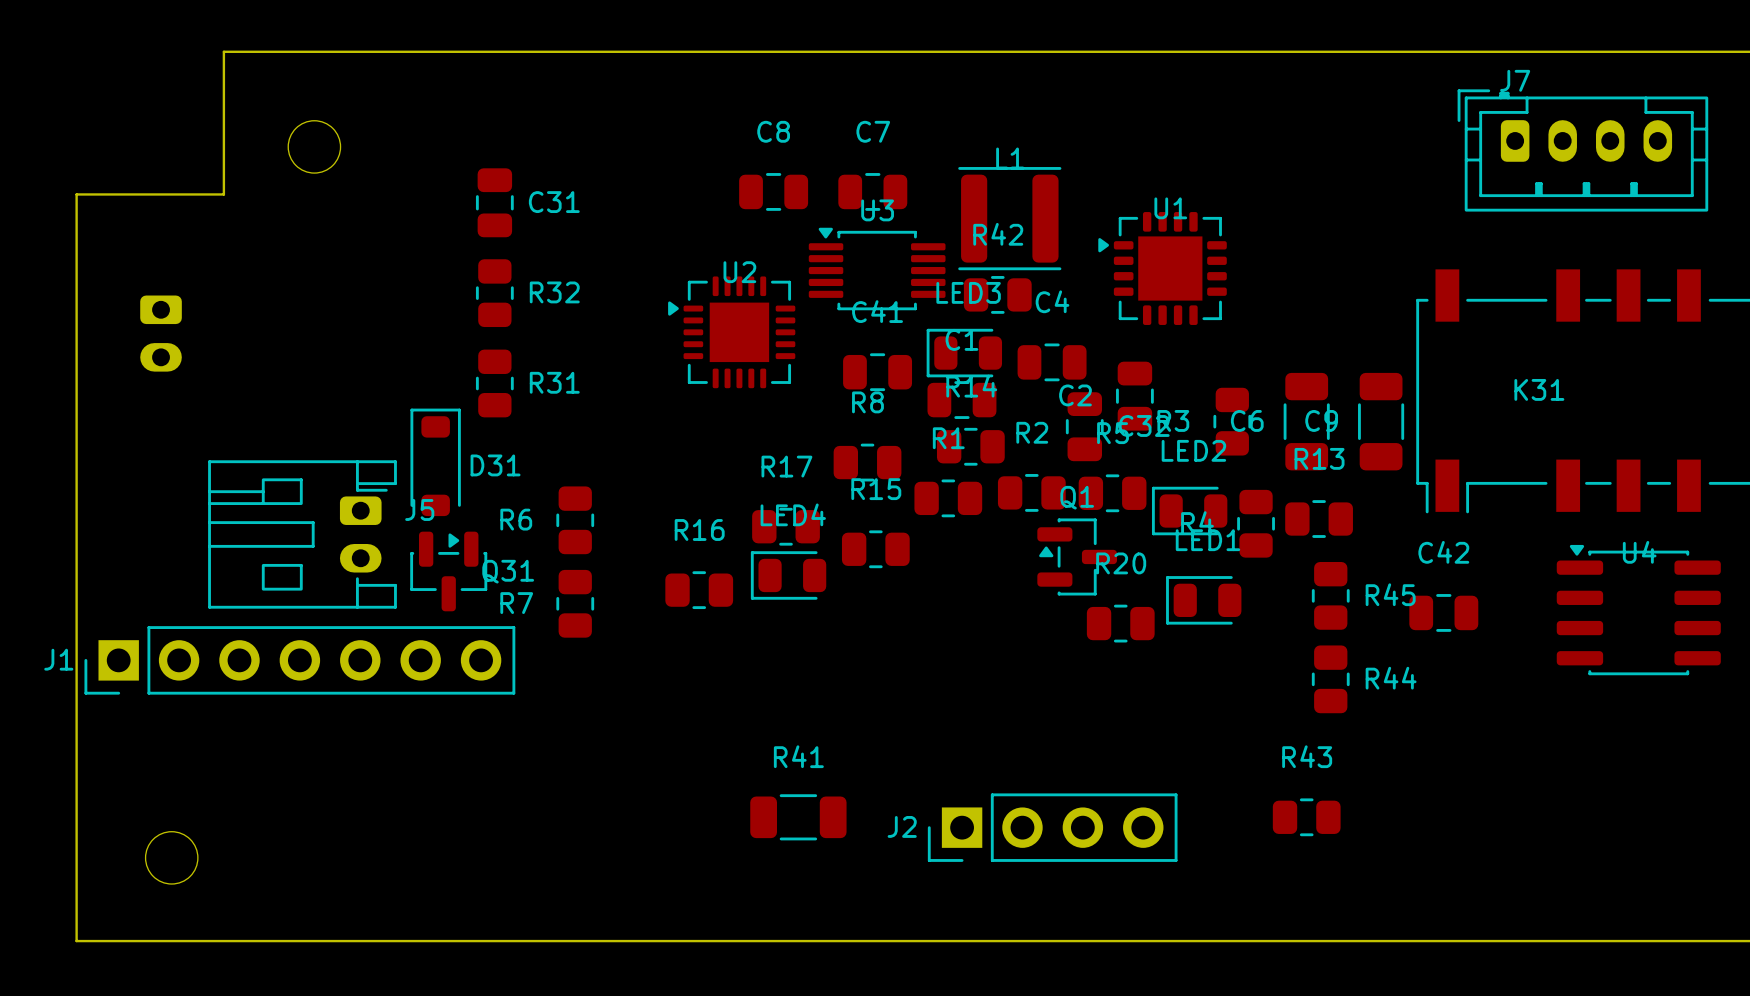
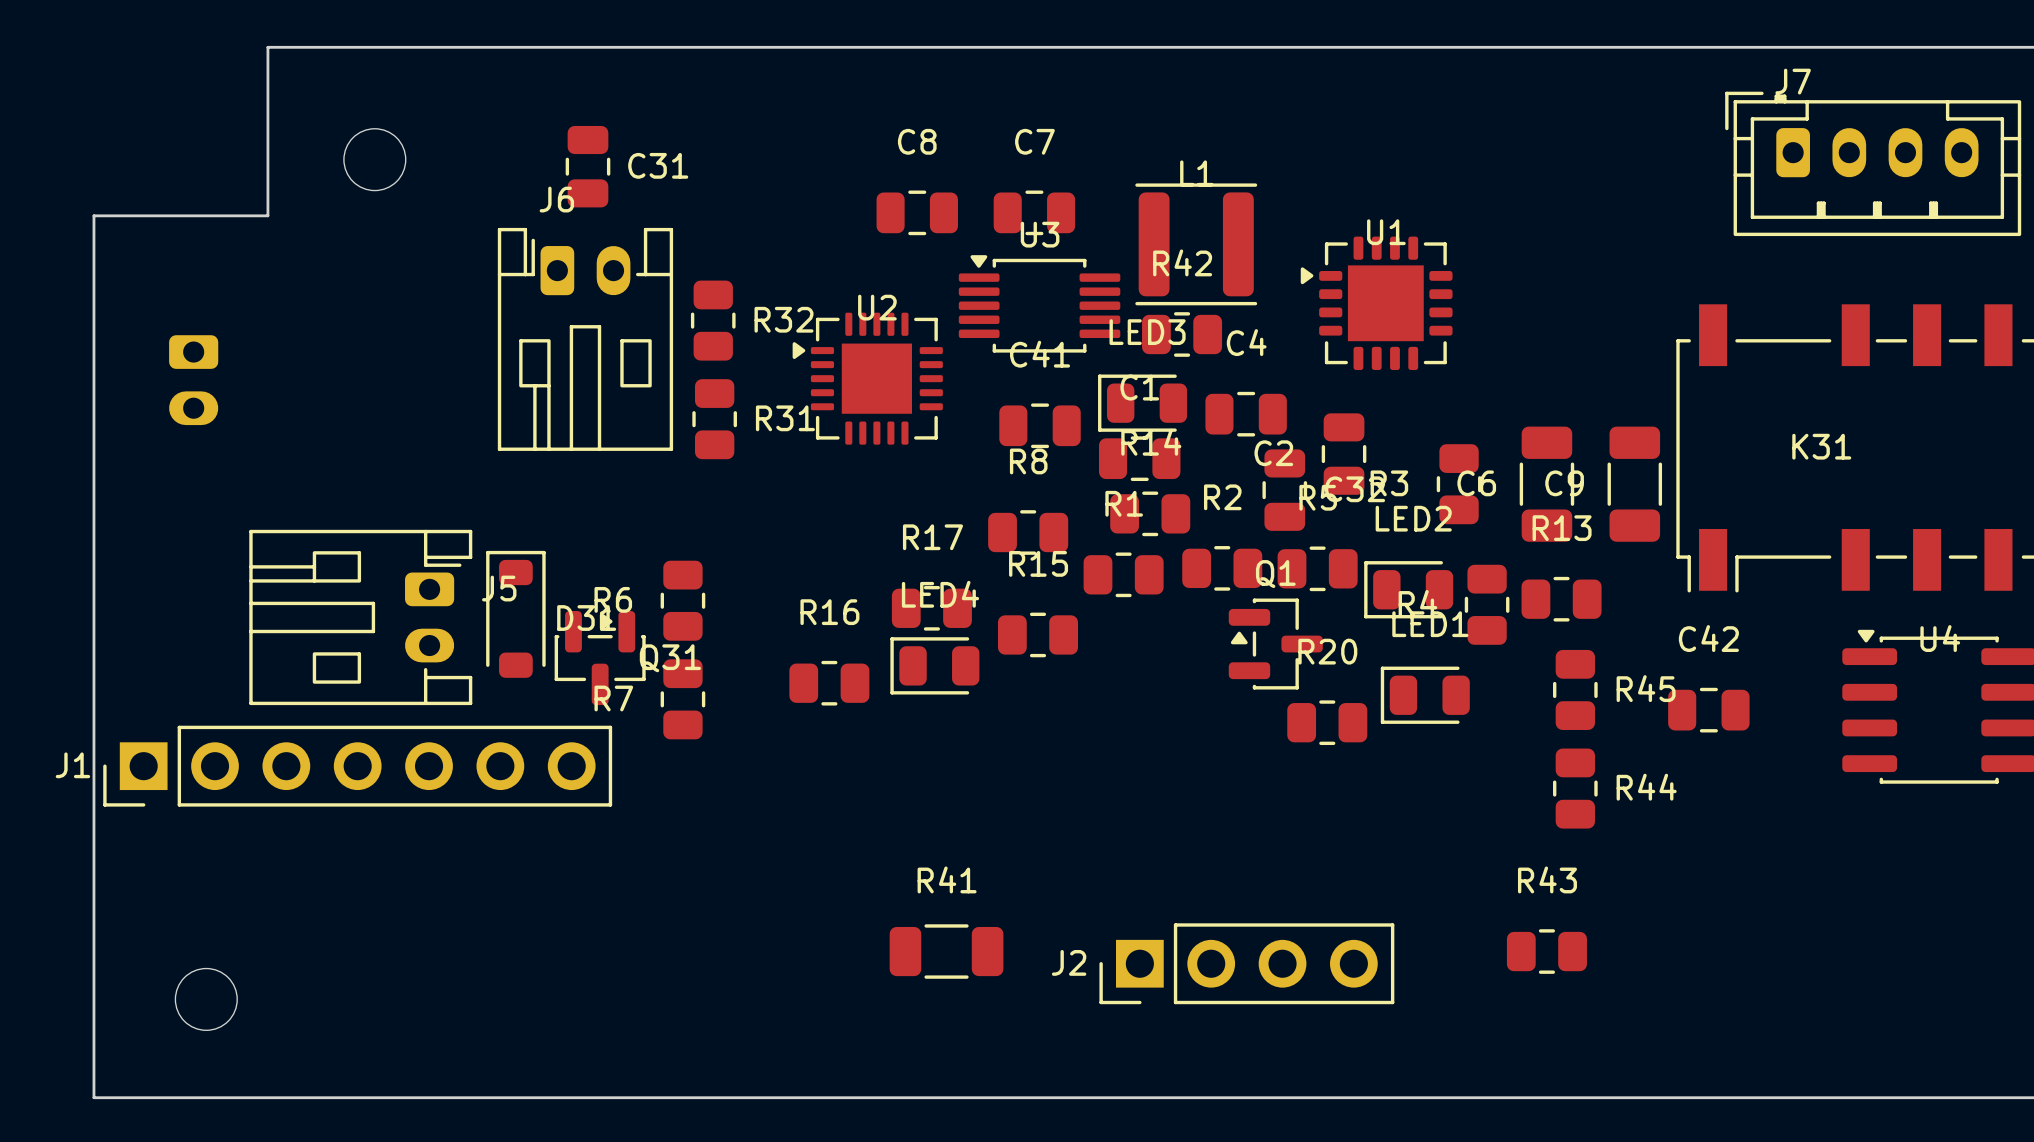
C31 position: (494, 202) -> (587, 166)
R32 position: (494, 293) -> (713, 320)
J6: none -> (585, 339)
R31 position: (494, 383) -> (714, 419)
D31 position: (435, 462) -> (515, 614)
Q31 position: (448, 571) -> (600, 658)

